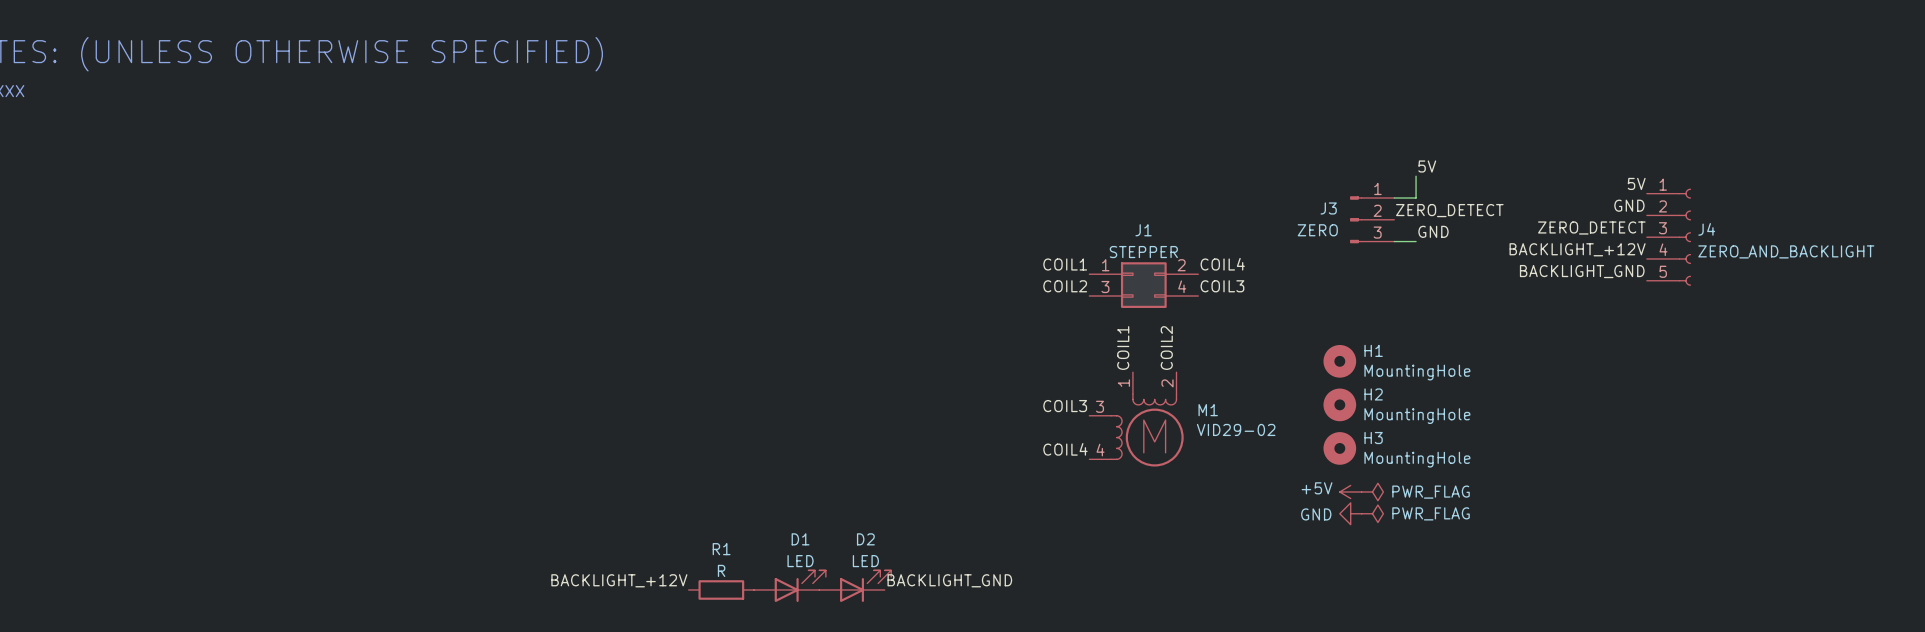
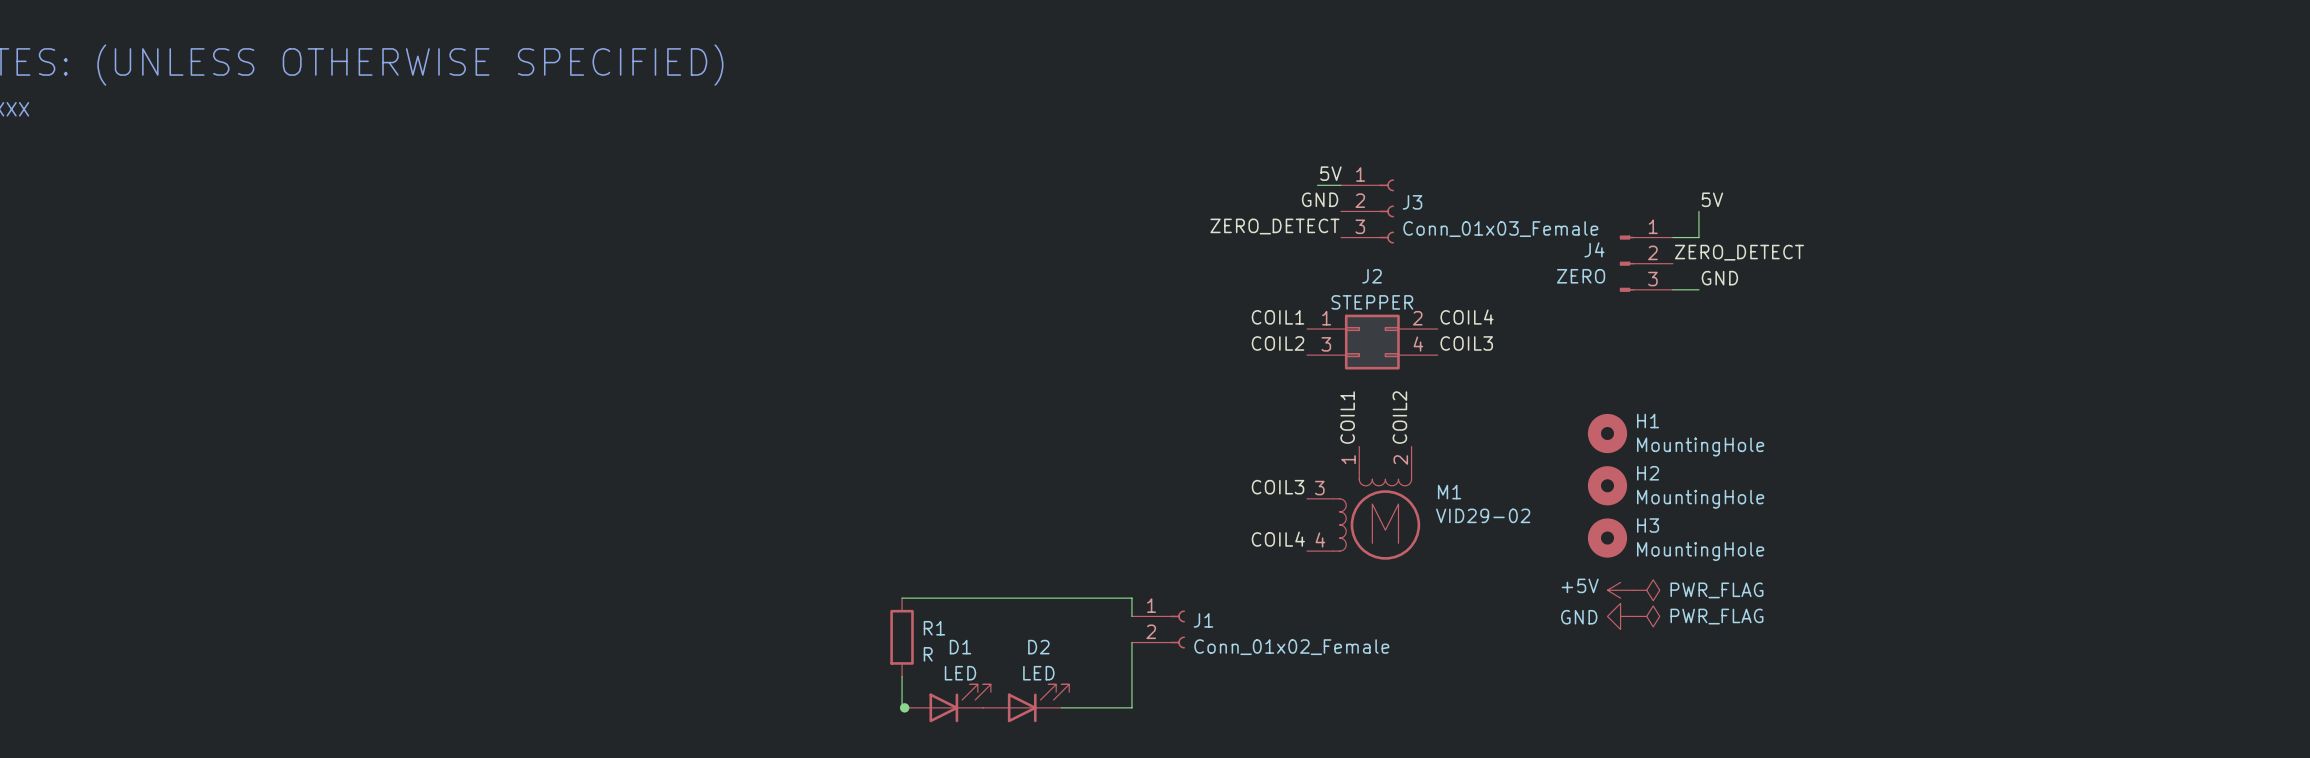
label: none -> 5V (1330, 173)
wire: none -> (1317, 185) (1340, 185)
label: none -> GND (1320, 199)
J3: none -> Conn_01x03_Female (1367, 211)
label: 5V (1636, 183) -> none
label: none -> ZERO_DETECT (1274, 226)
label: GND (1629, 205) -> none
J3 name: J3 (1328, 208) -> J4 (1594, 249)
label: ZERO_DETECT (1591, 228) -> none
J1 name: J1 (1143, 230) -> J2 (1372, 276)
J4: ZERO_AND_BACKLIGHT (1668, 237) -> none
label: BACKLIGHT_+12V (1577, 249) -> none
label: BACKLIGHT_GND (1582, 271) -> none
wire: none -> (902, 598) (1131, 598) (1131, 616)
J1: none -> Conn_01x02_Female (1158, 629)
wire: none -> (1131, 642) (1131, 707) (1061, 707)
wire: none -> (902, 676) (902, 707) (907, 707)
label: BACKLIGHT_+12V (619, 580) -> none
label: BACKLIGHT_GND (949, 580) -> none
R1 rotation: 0° (721, 589) -> 90° clockwise (902, 637)
R1 position: (721, 589) -> (902, 637)
junction: none -> (904, 707)

